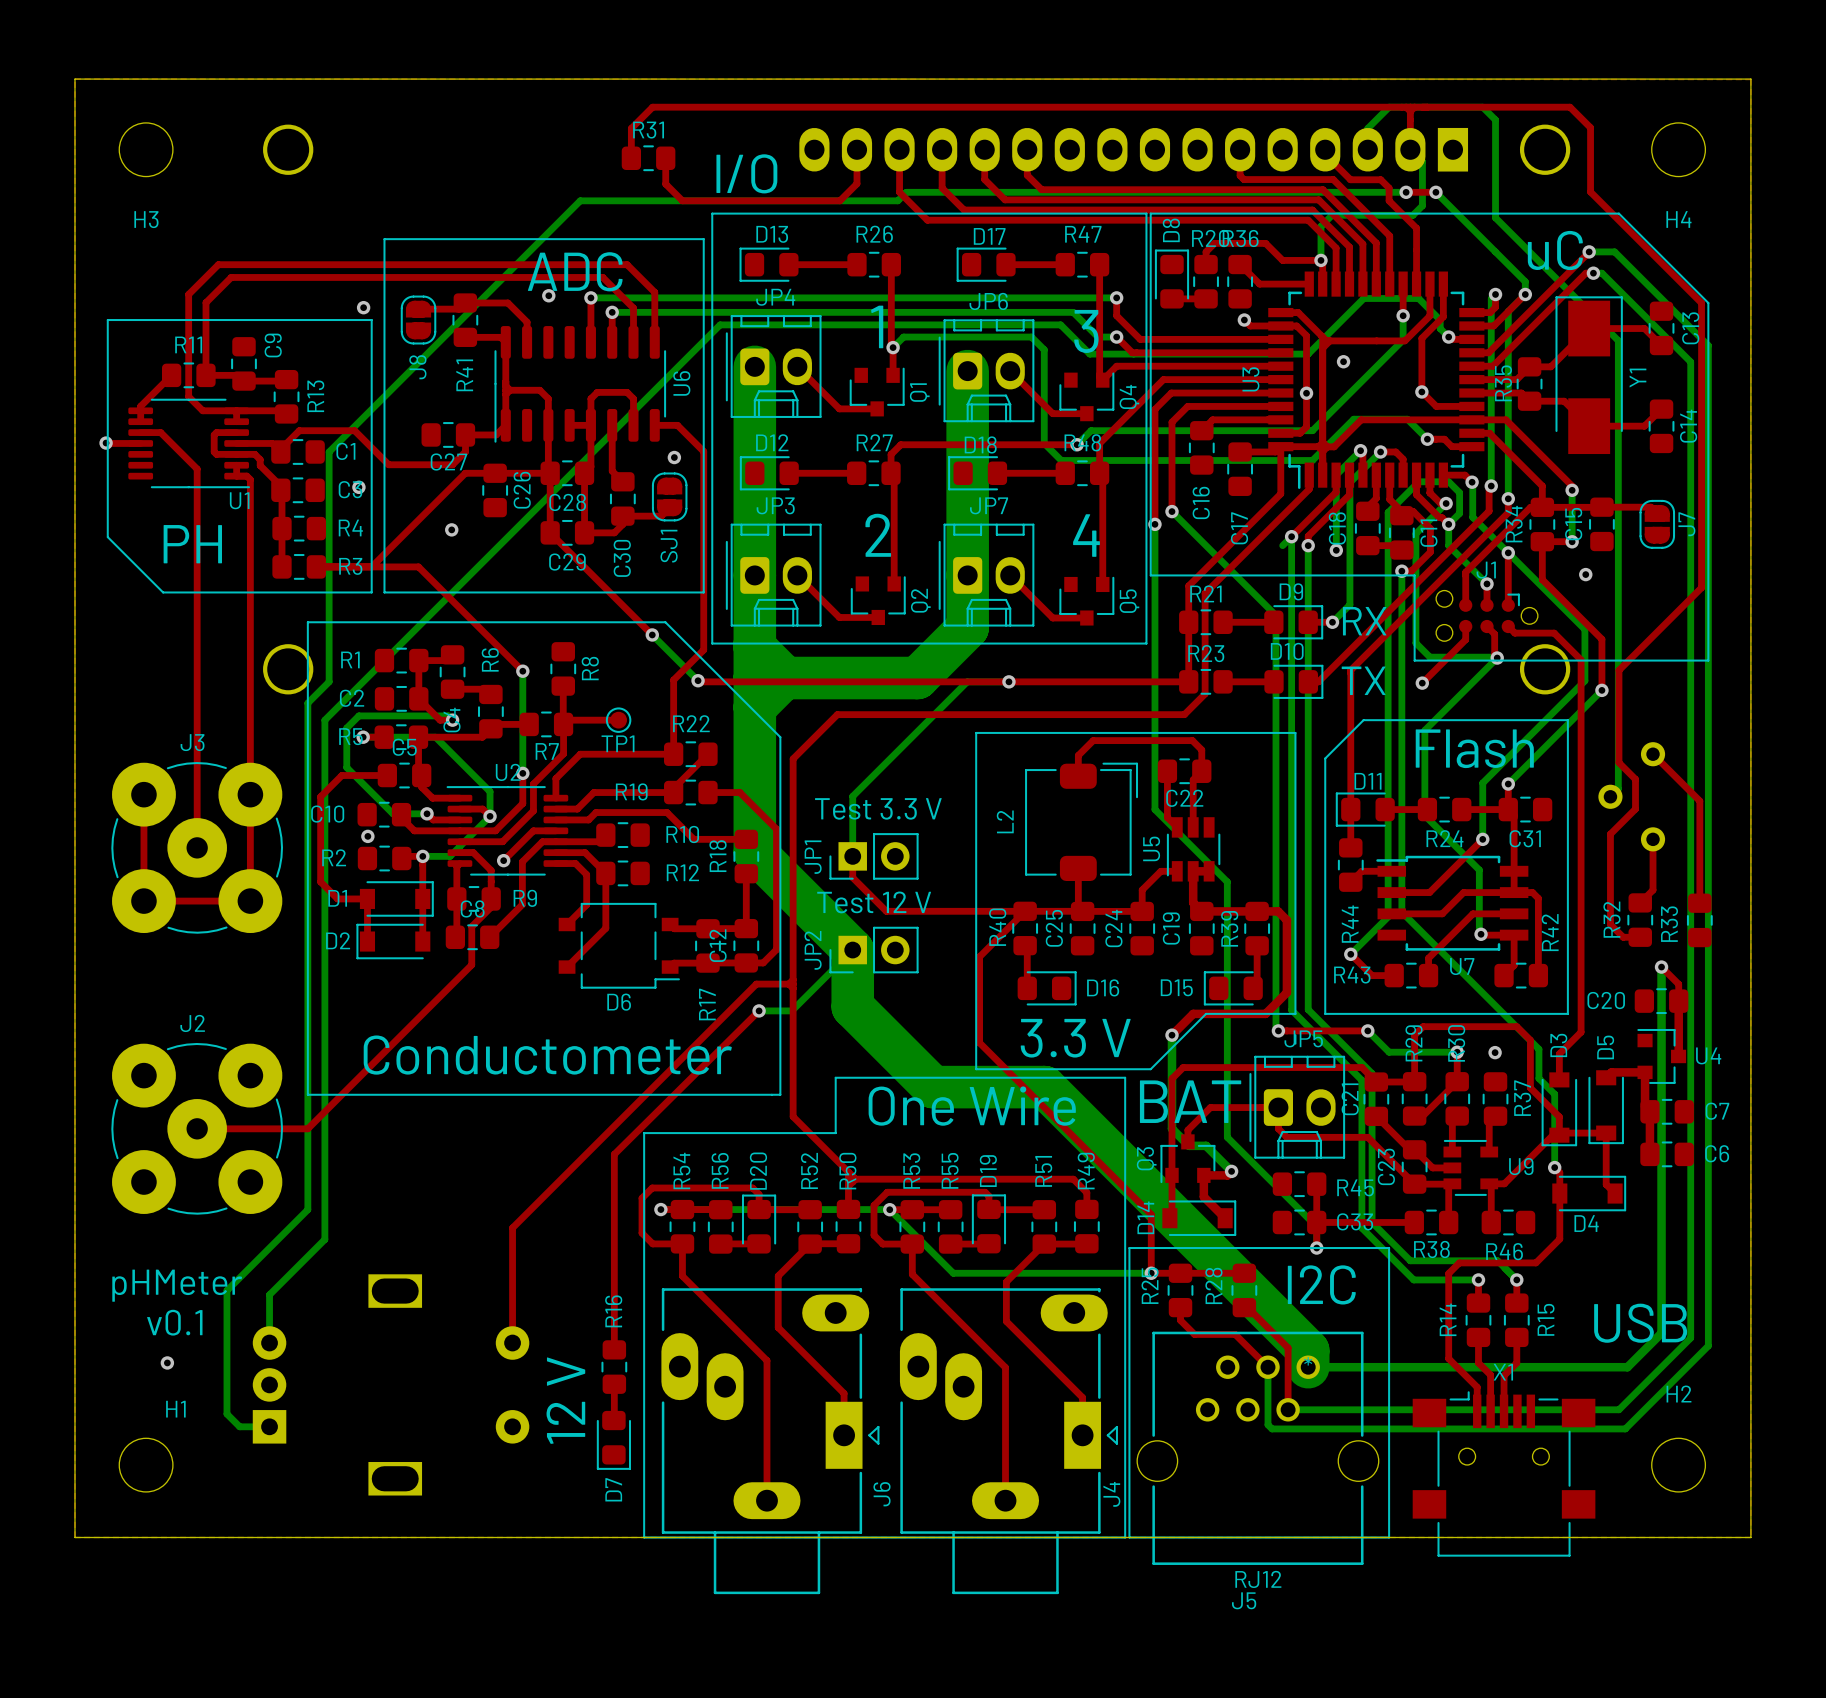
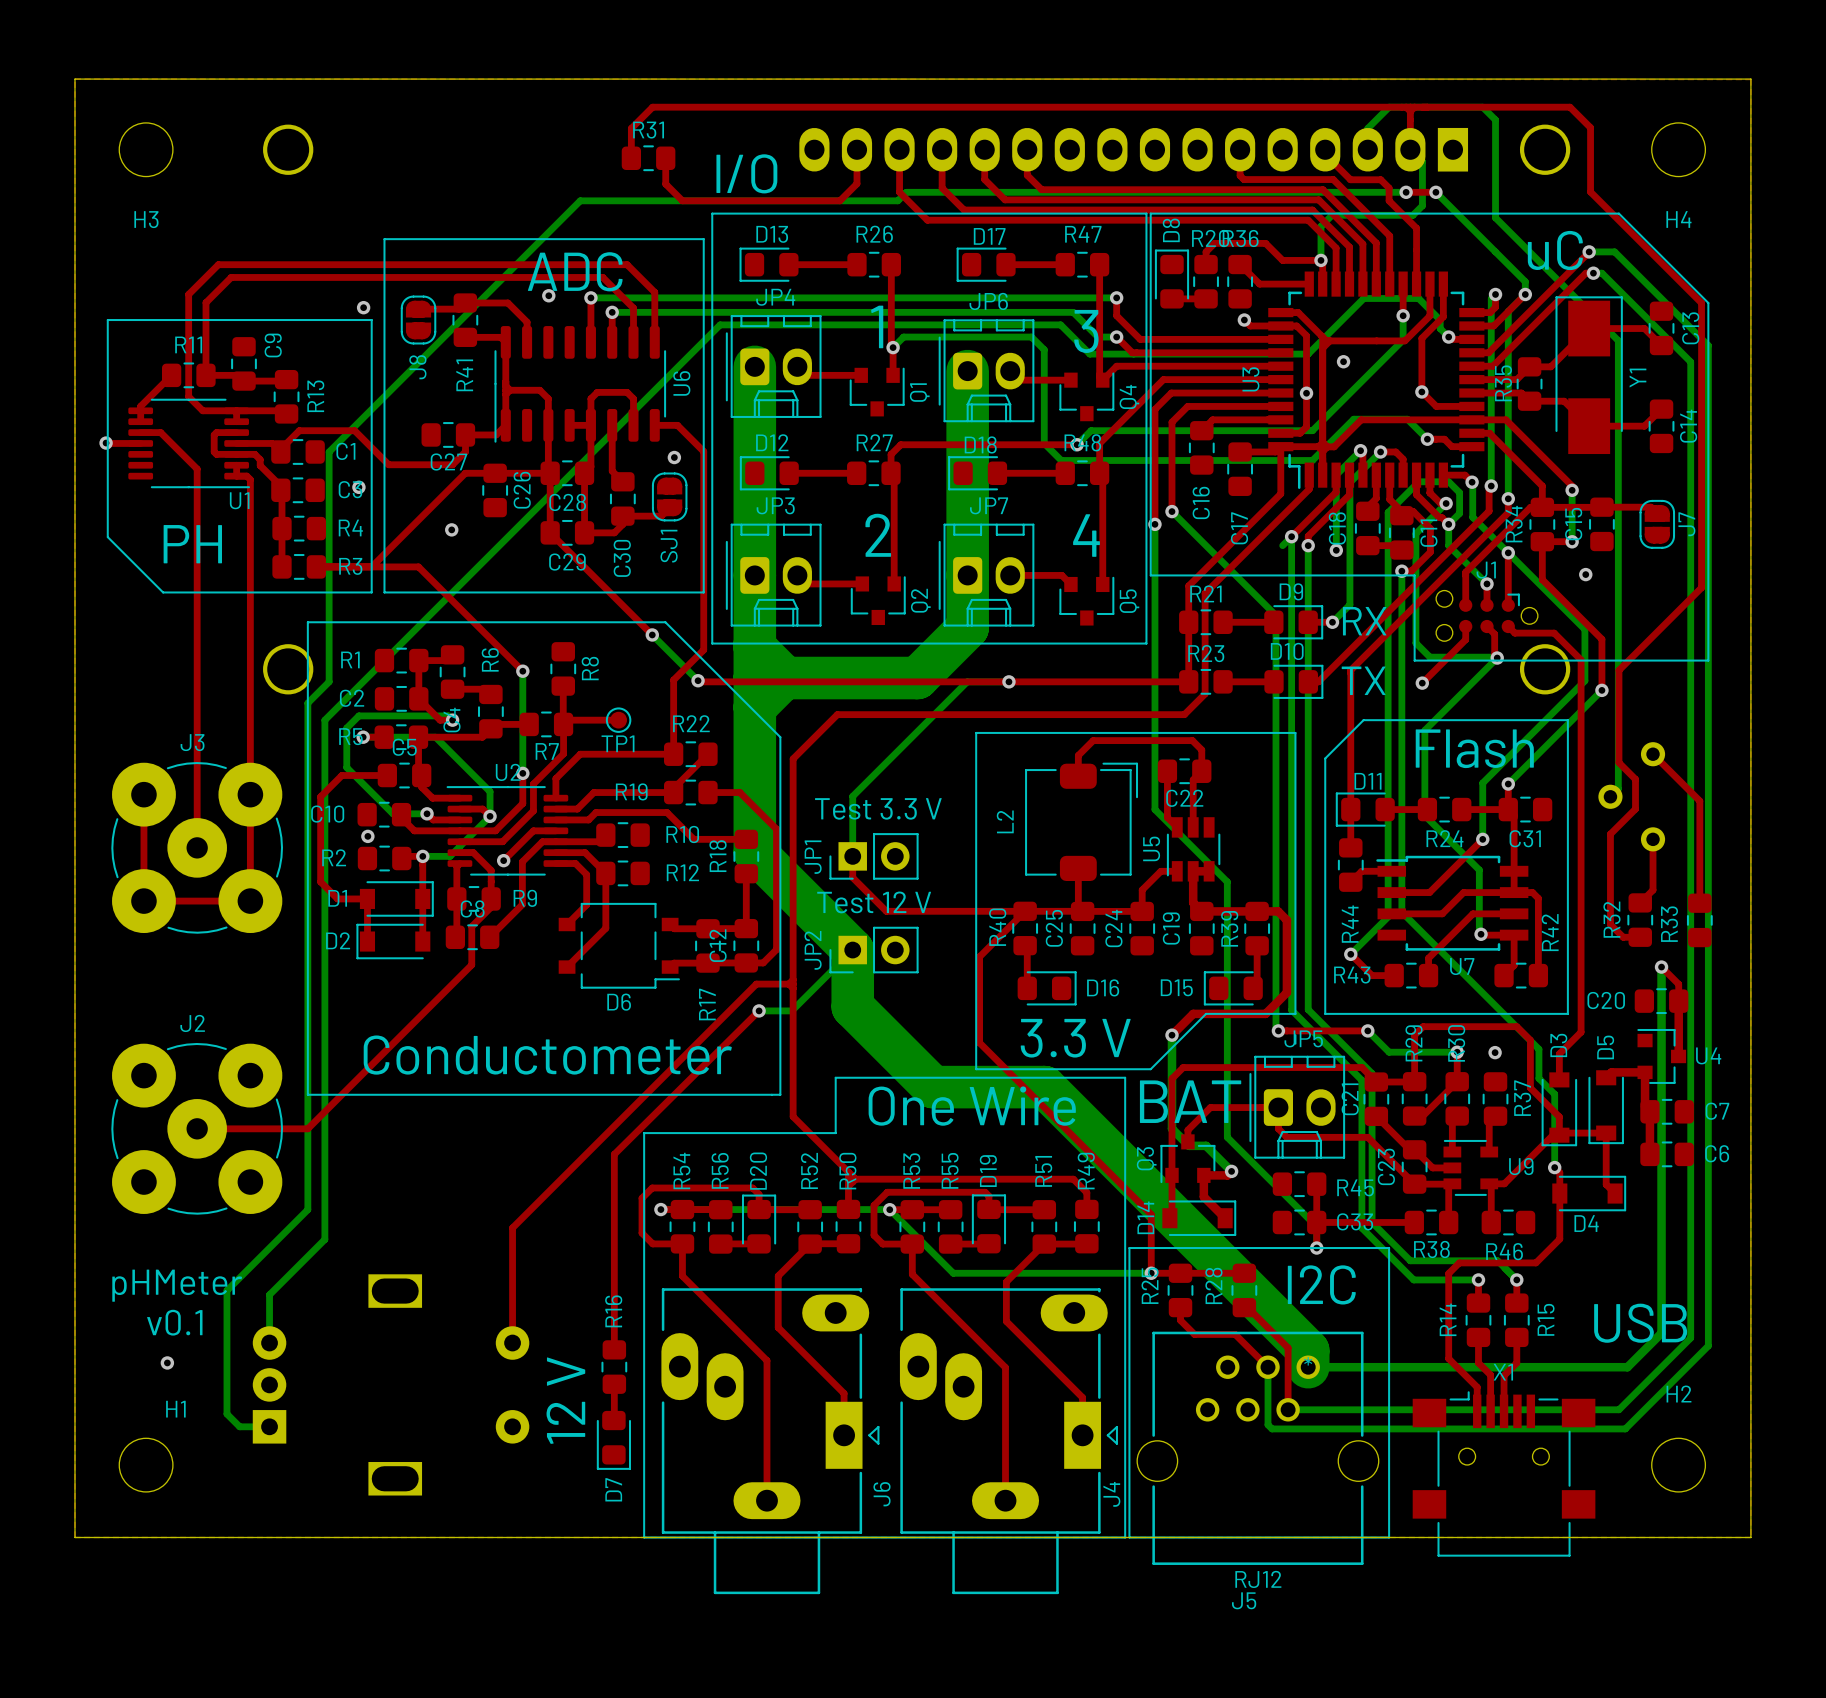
top track: (805, 375) (839, 408) (877, 408) -> (805, 375) (861, 375)
top track: (1019, 380) (1052, 413) (1086, 413) -> (1019, 380) (1070, 380)
top track: (1010, 575) (1052, 618) (1086, 618) -> (1010, 575) (1061, 575) (1070, 584)
top track: (805, 583) (839, 617) (878, 617) -> (805, 583) (862, 583)

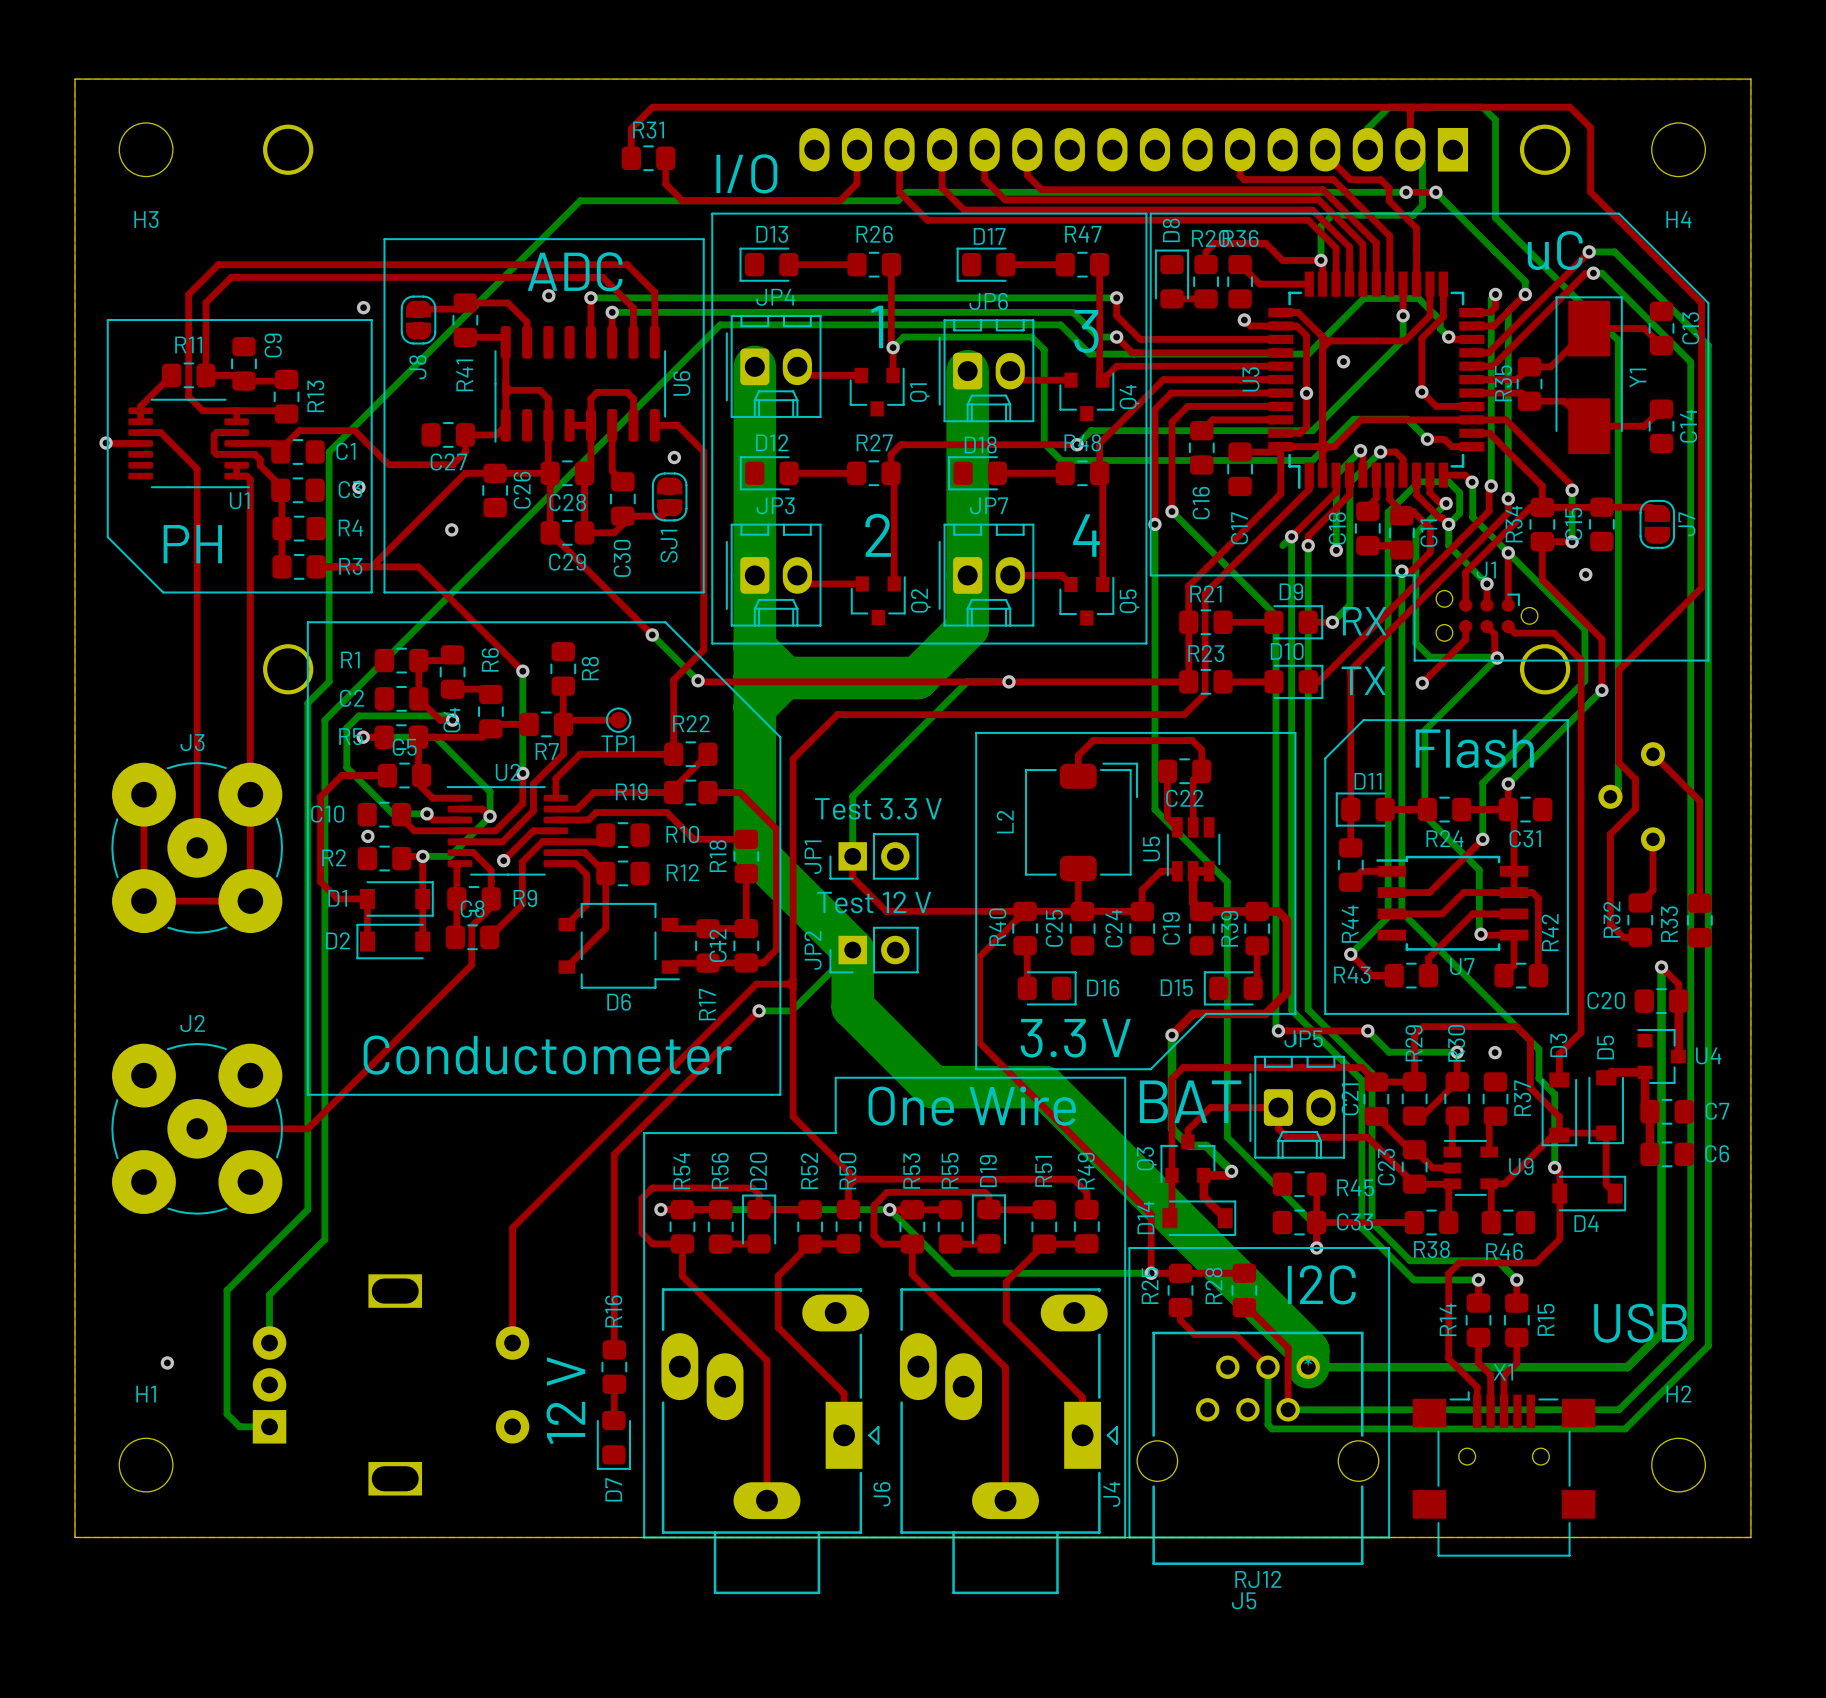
text: pHMeter (177, 1285) -> none
text: v0.1 (174, 1322) -> none
H1 name position: H1 (175, 1409) -> H1 (146, 1394)

